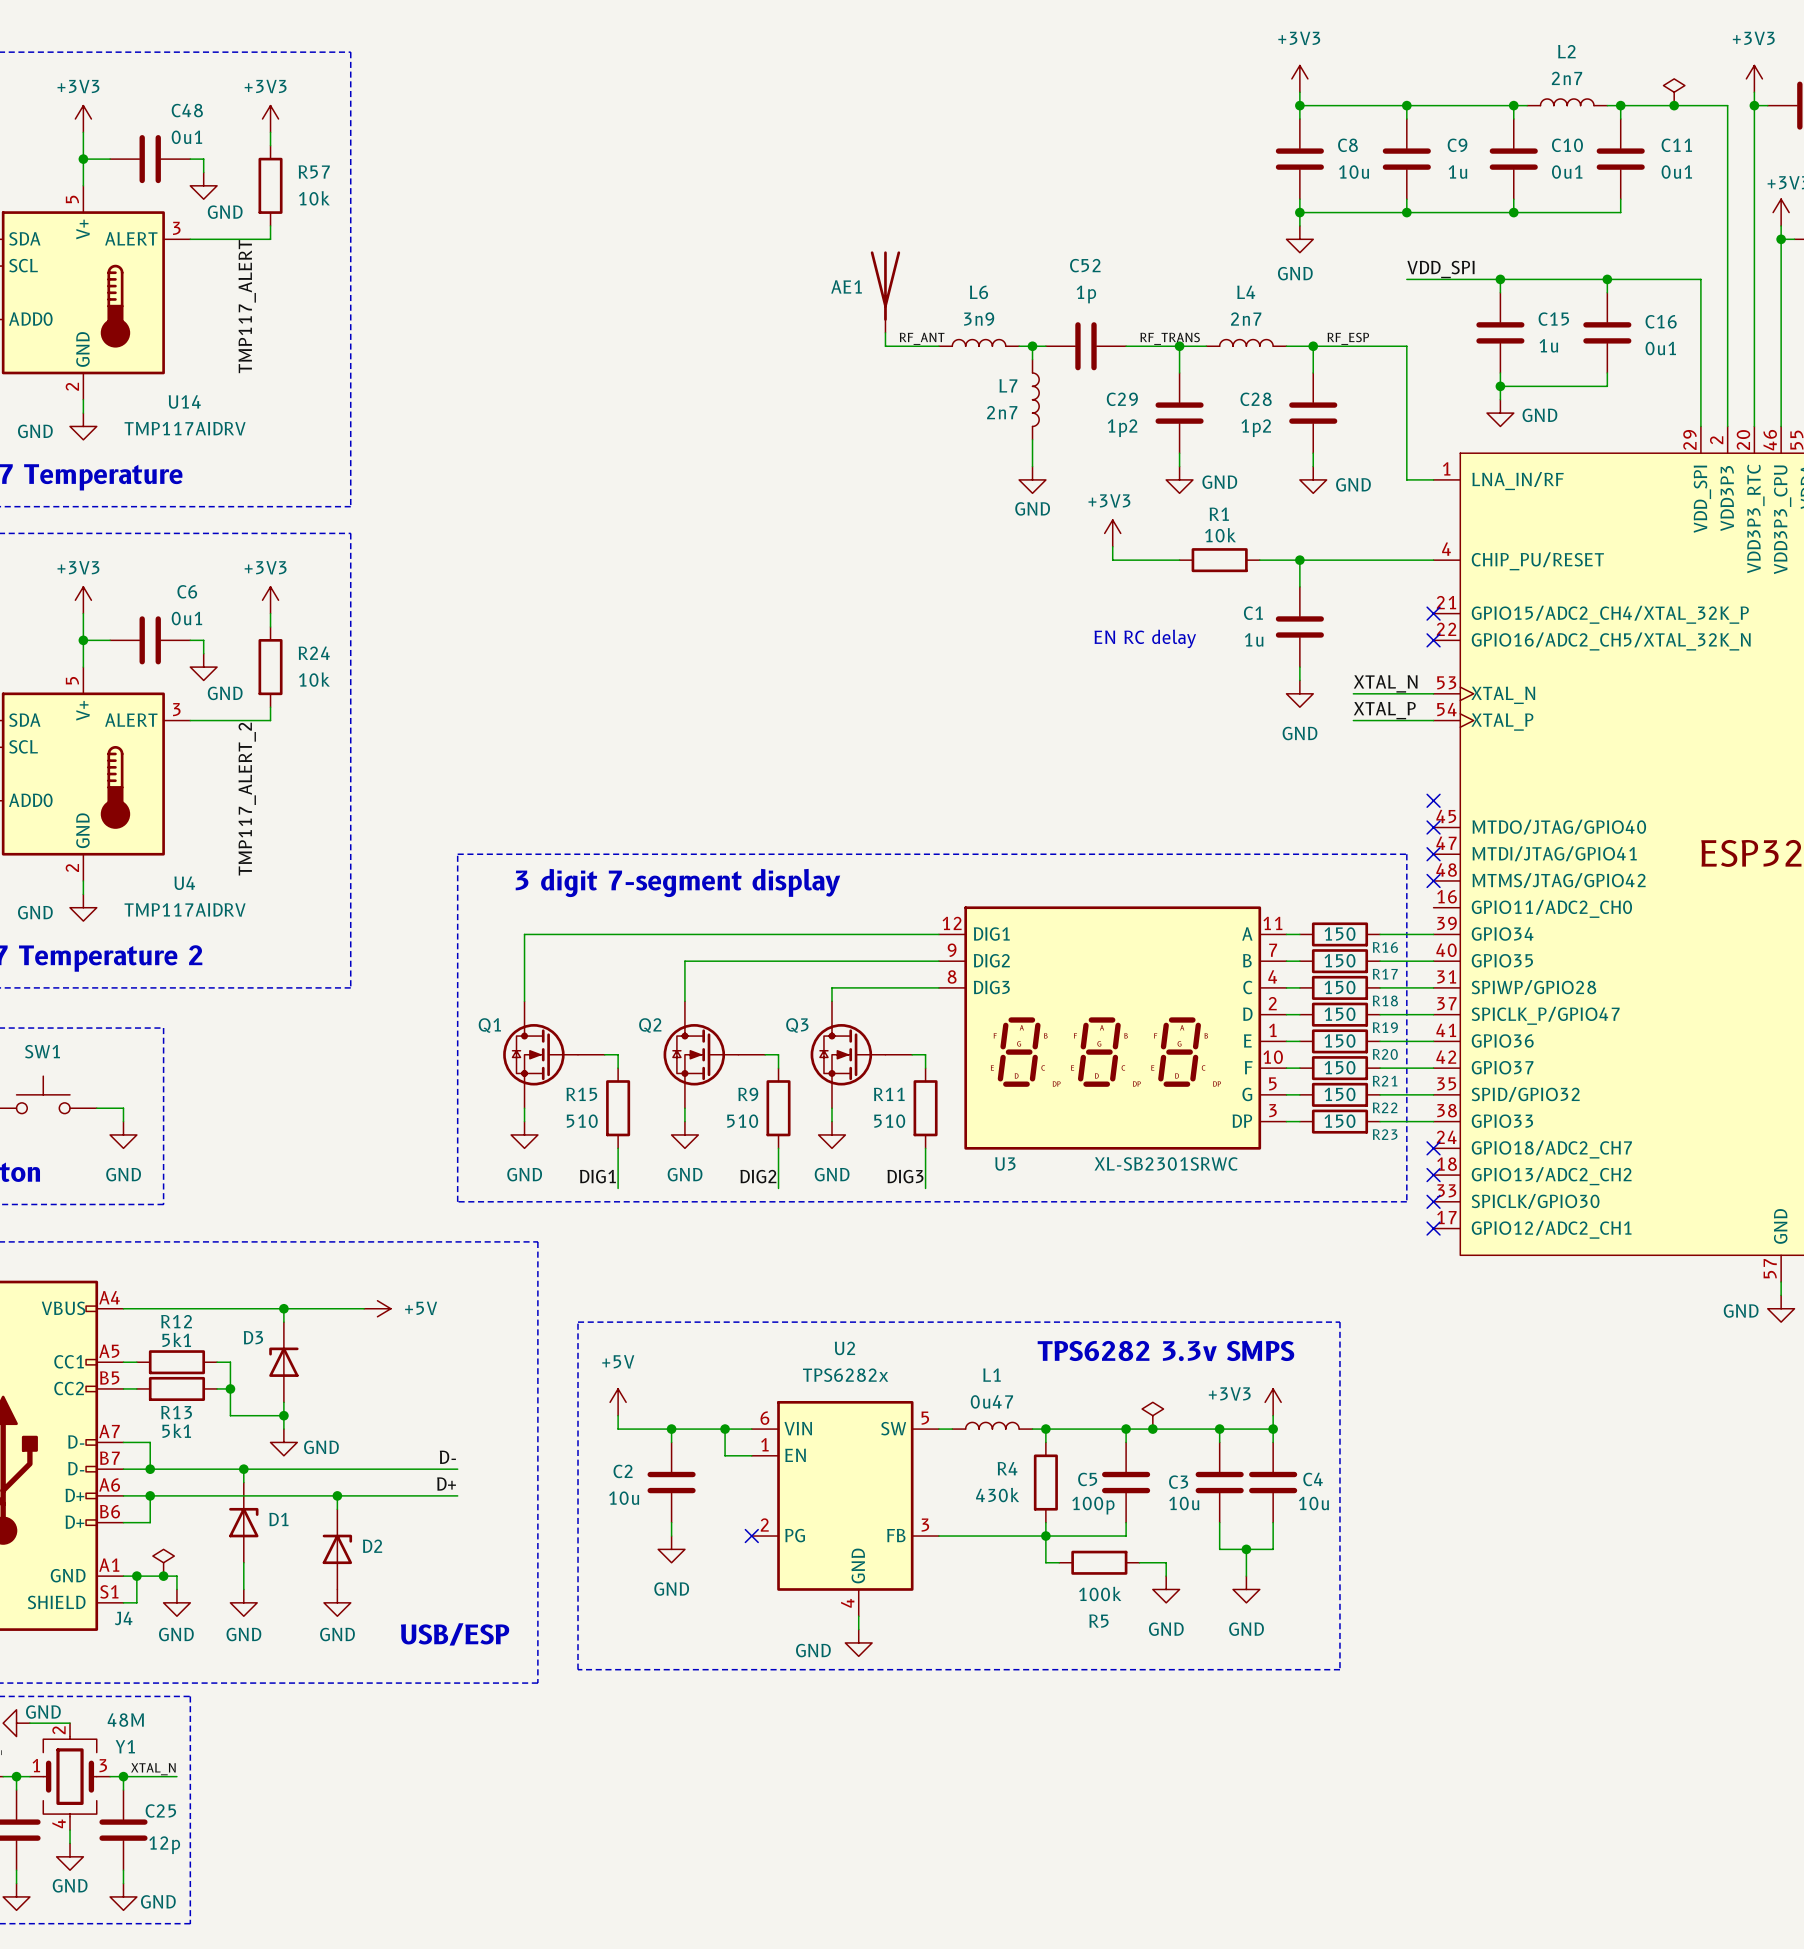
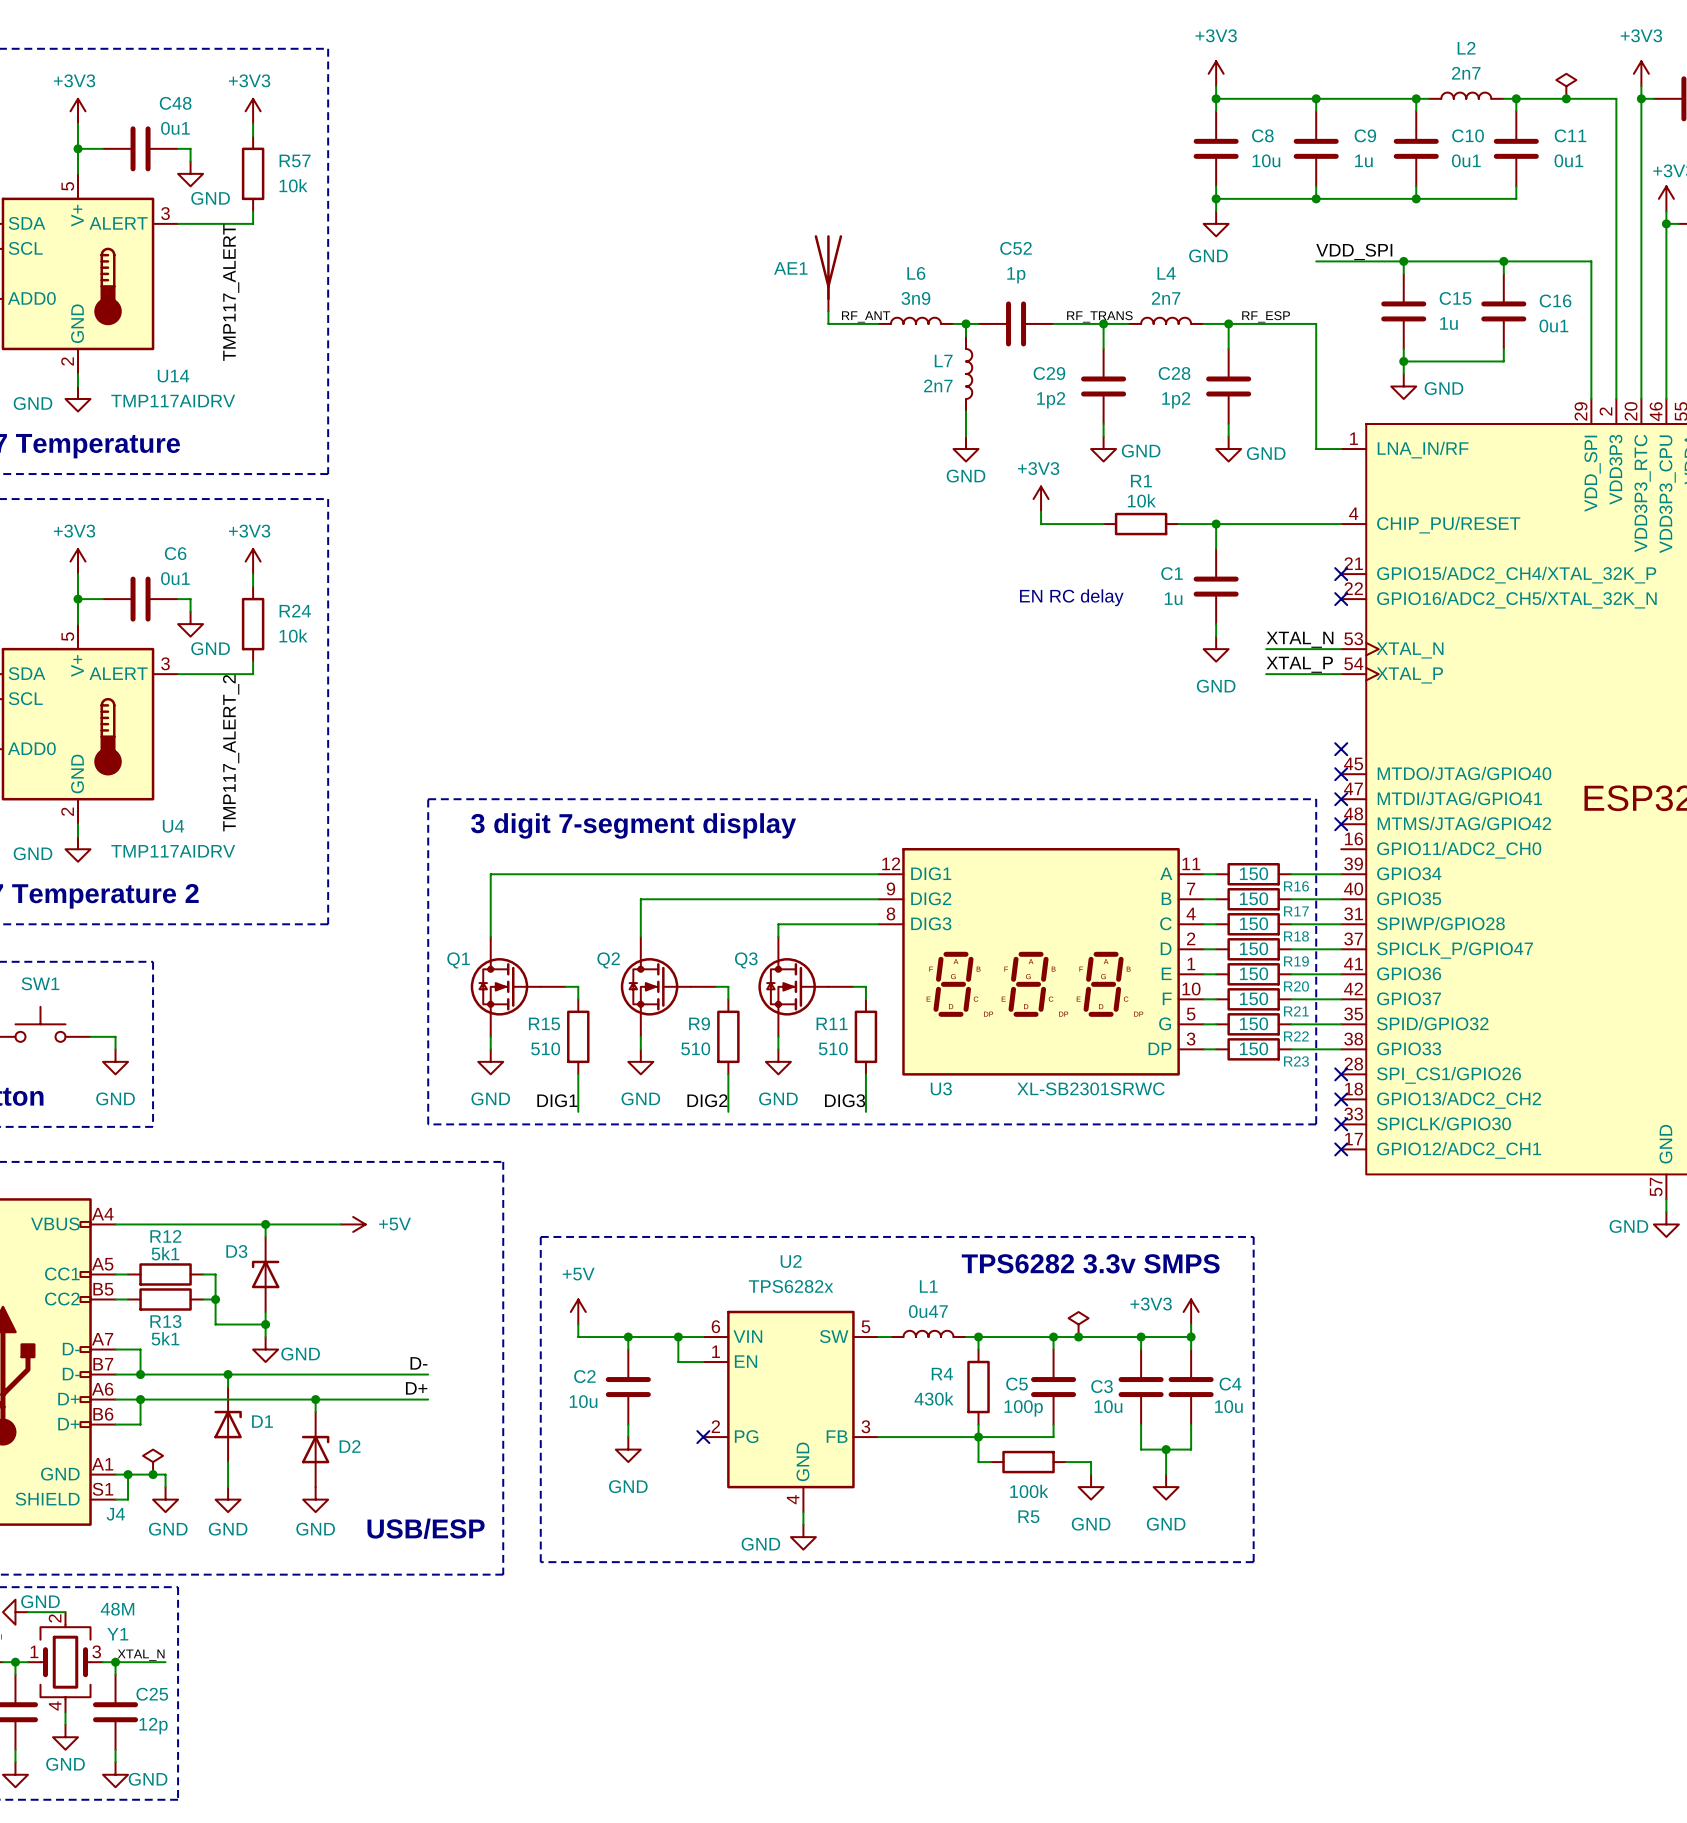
part pin number: 24 (1446, 1137) -> 28 (1353, 1064)
part pin name: GPIO18/ADC2_CH7 (1551, 1149) -> SPI_CS1/GPIO26 (1449, 1075)

